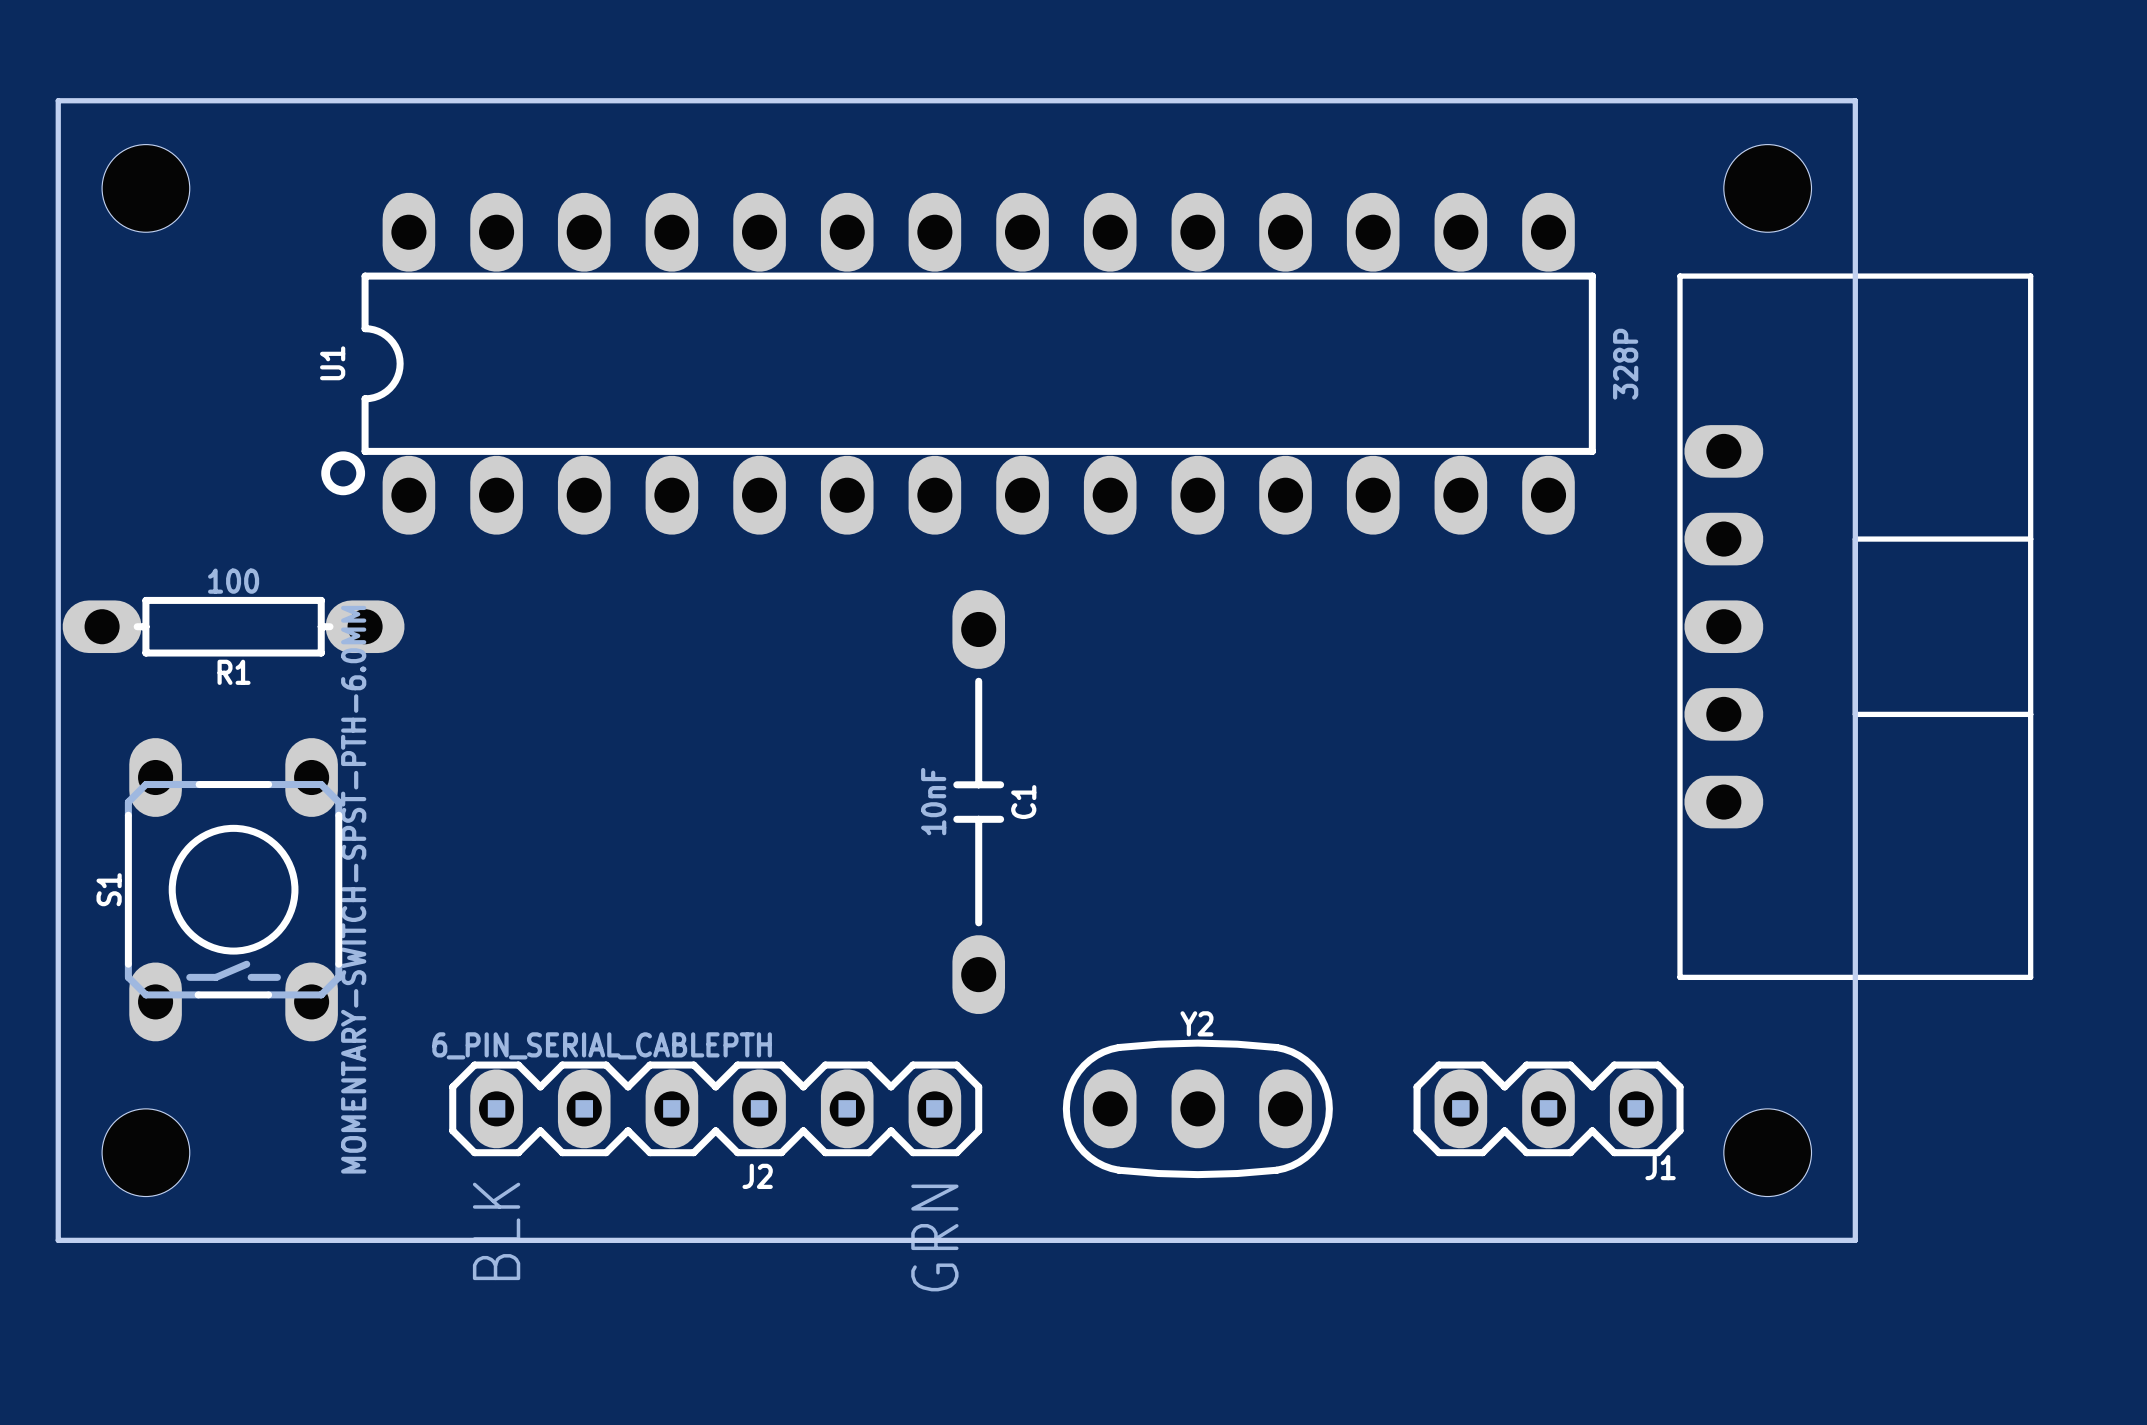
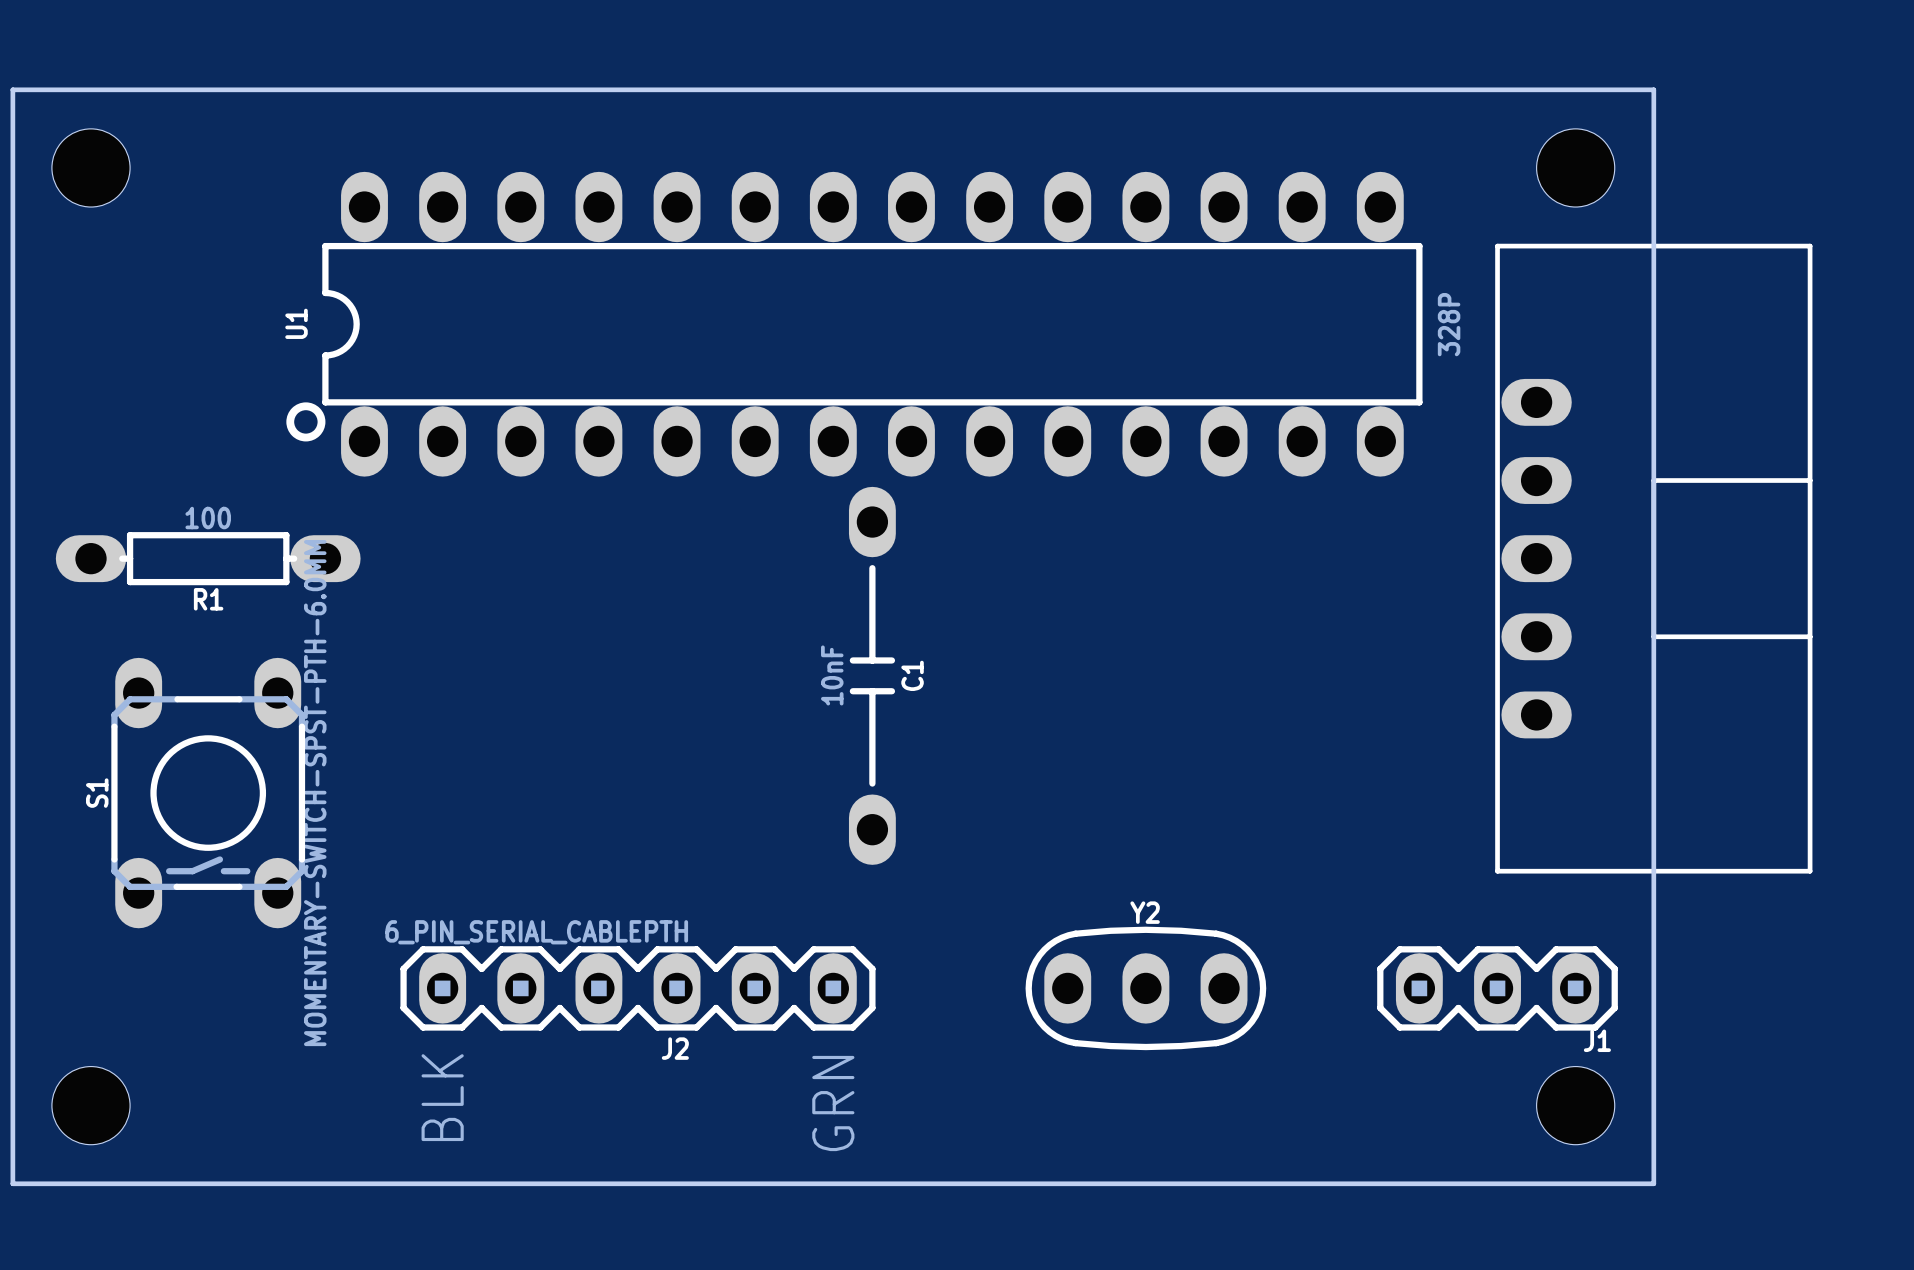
board edge: (58, 100) (58, 1240) (1855, 1240) -> (51, 89) (12, 89) (12, 1183) (1653, 1183) (1653, 1105)
hole position: (145, 188) -> (91, 167)
C1 position: (978, 802) -> (872, 675)
Y2 position: (1197, 1108) -> (1145, 988)
J1 position: (1548, 1108) -> (1497, 988)
hole position: (145, 1152) -> (91, 1105)
hole position: (1767, 1152) -> (1575, 1105)

